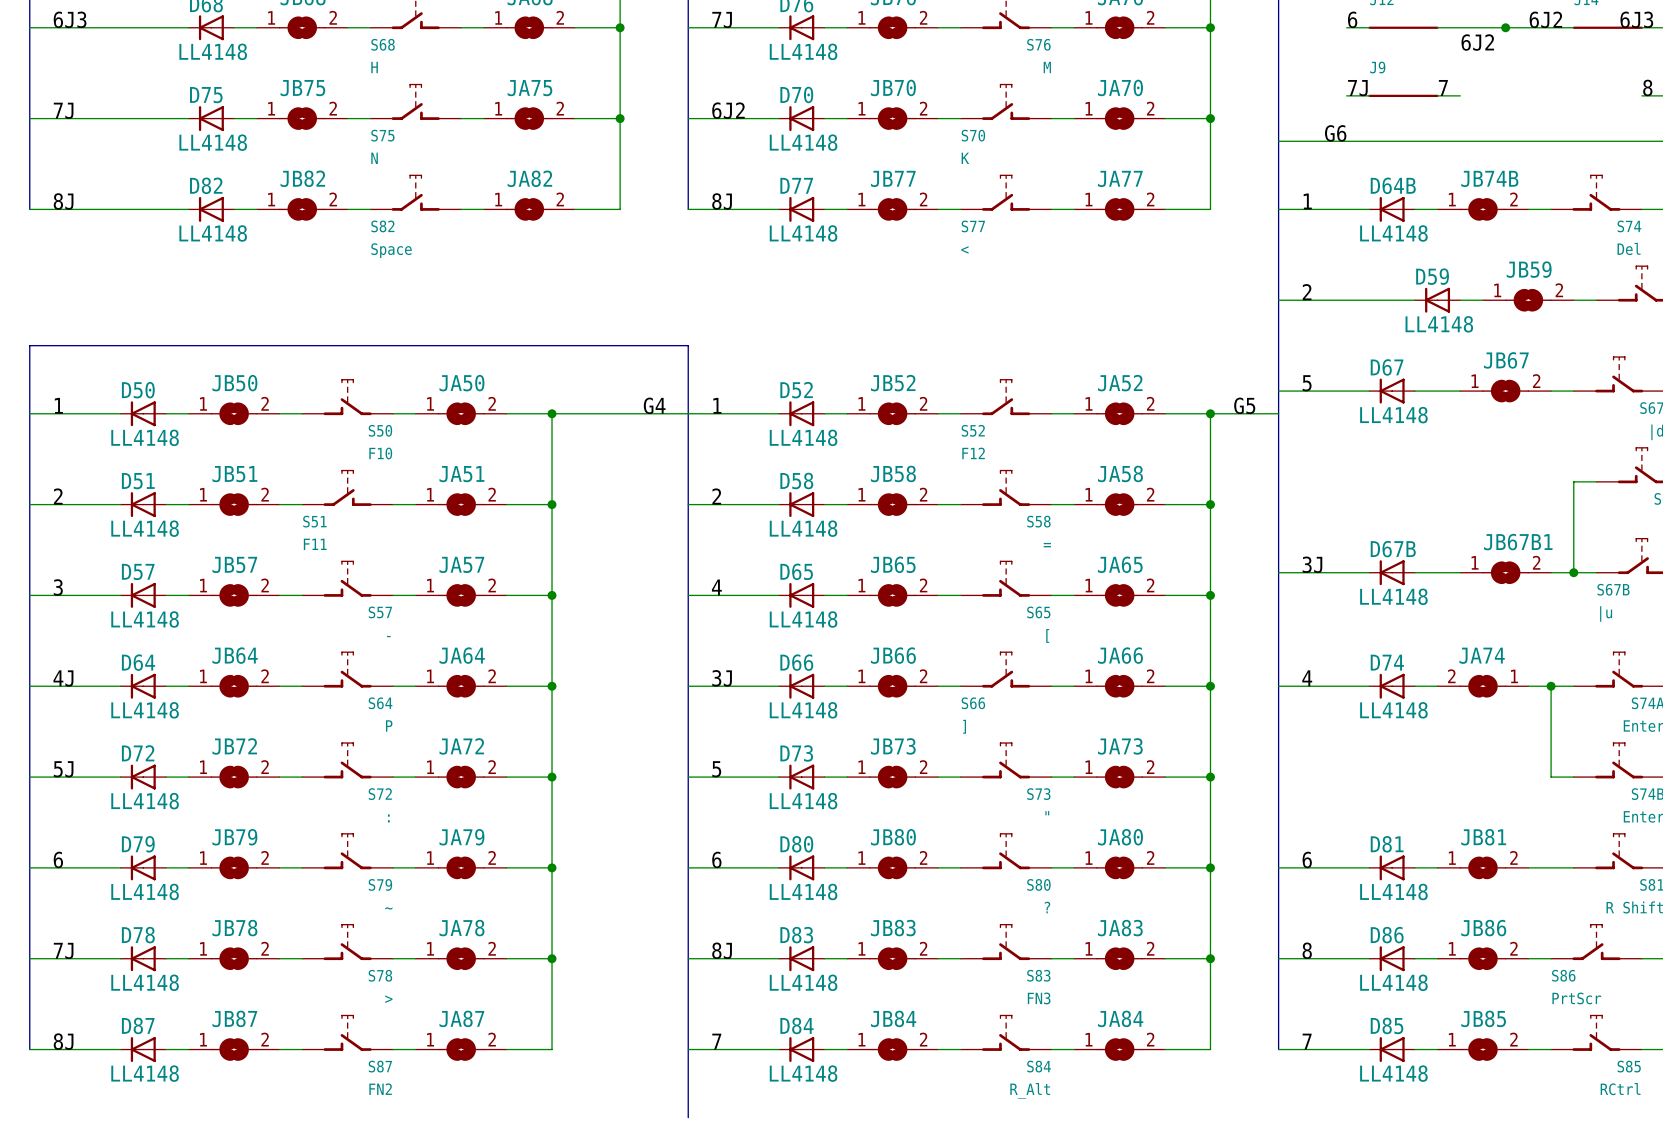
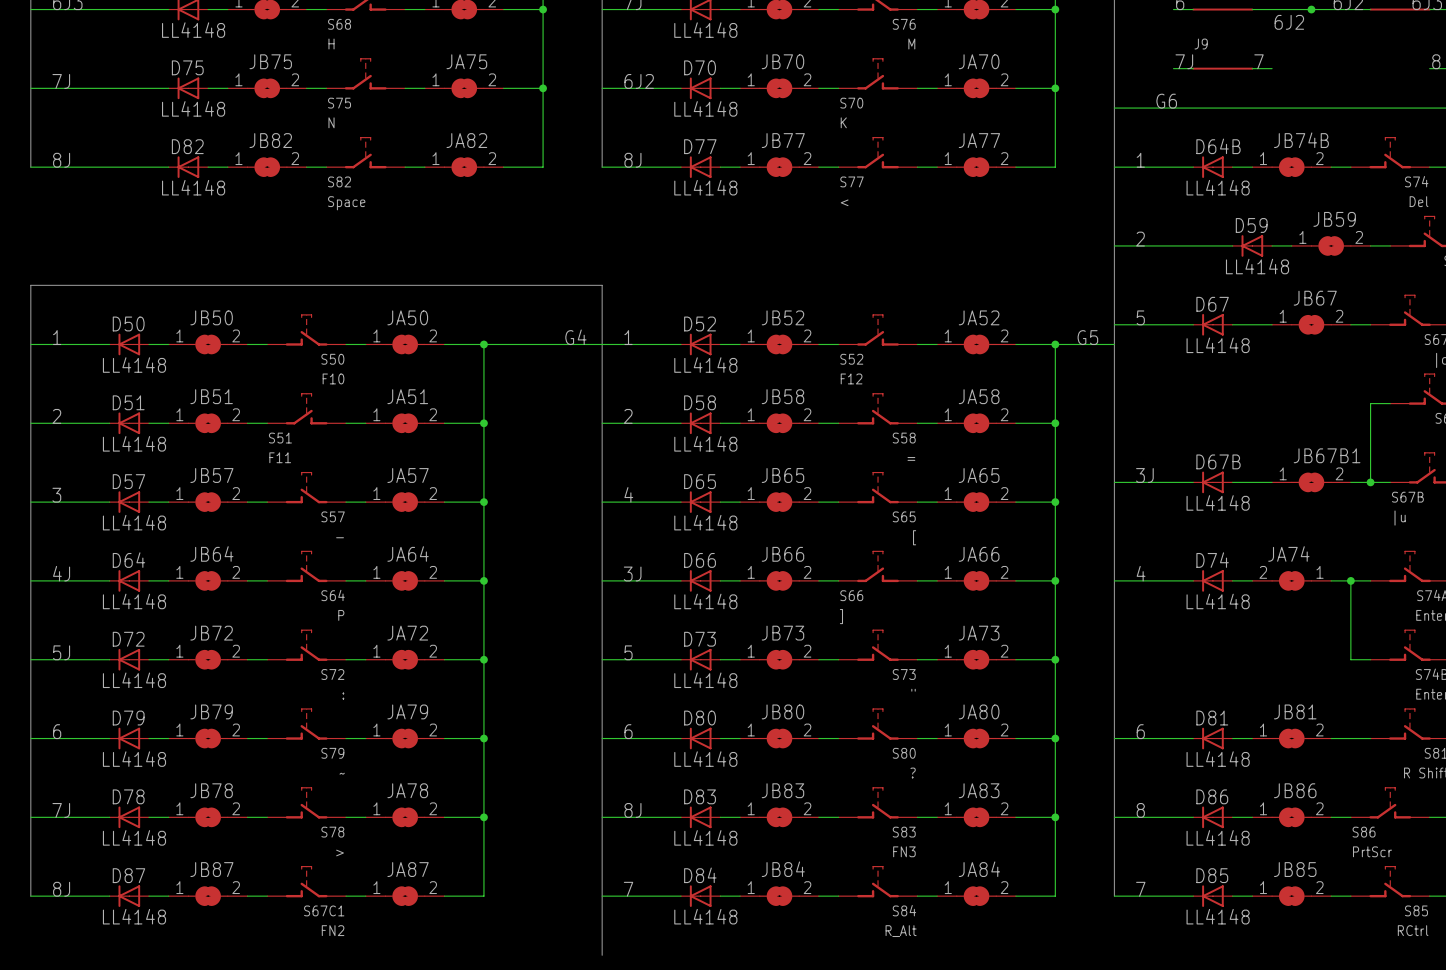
S87 name: S87 (380, 1066) -> S67C1 (324, 910)

